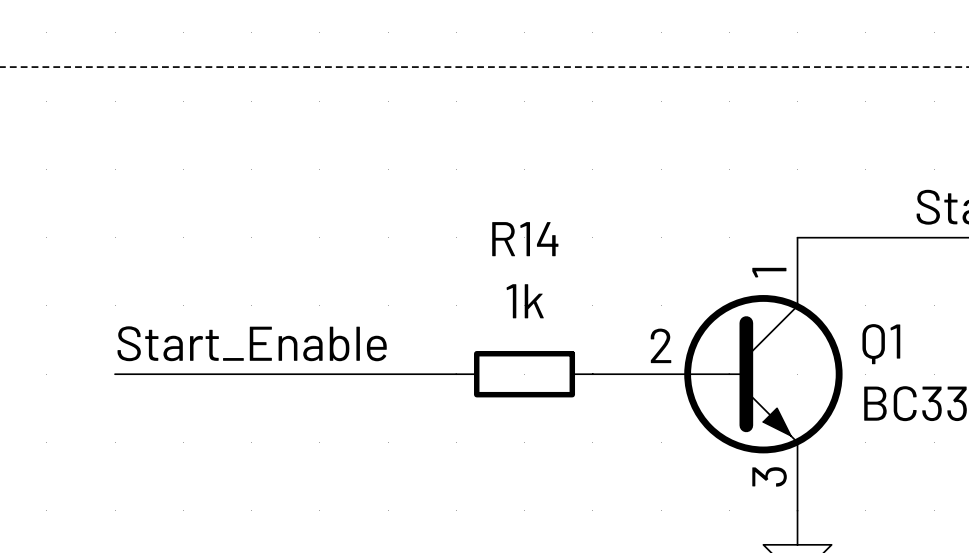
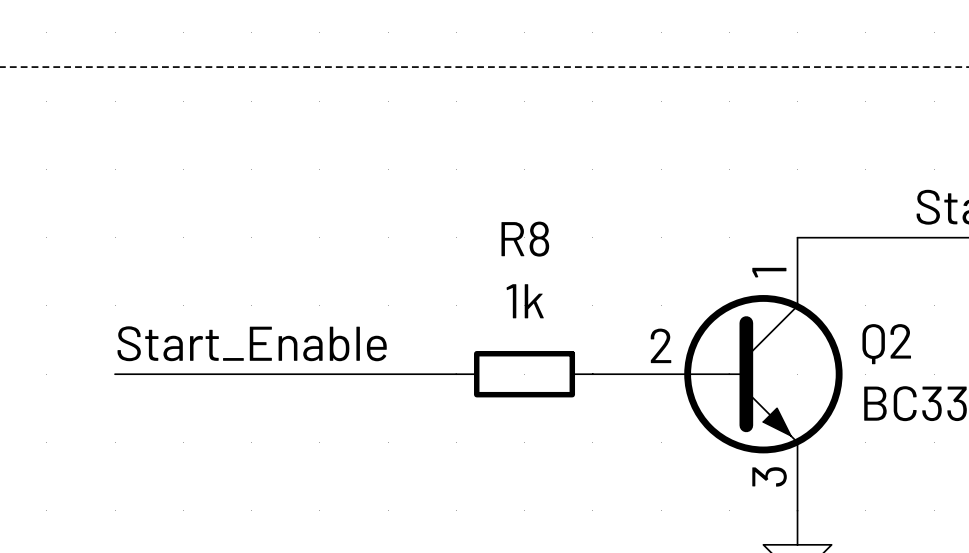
R14 name: R14 (525, 239) -> R8 (525, 239)
Q1 name: Q1 (881, 344) -> Q2 (886, 344)

